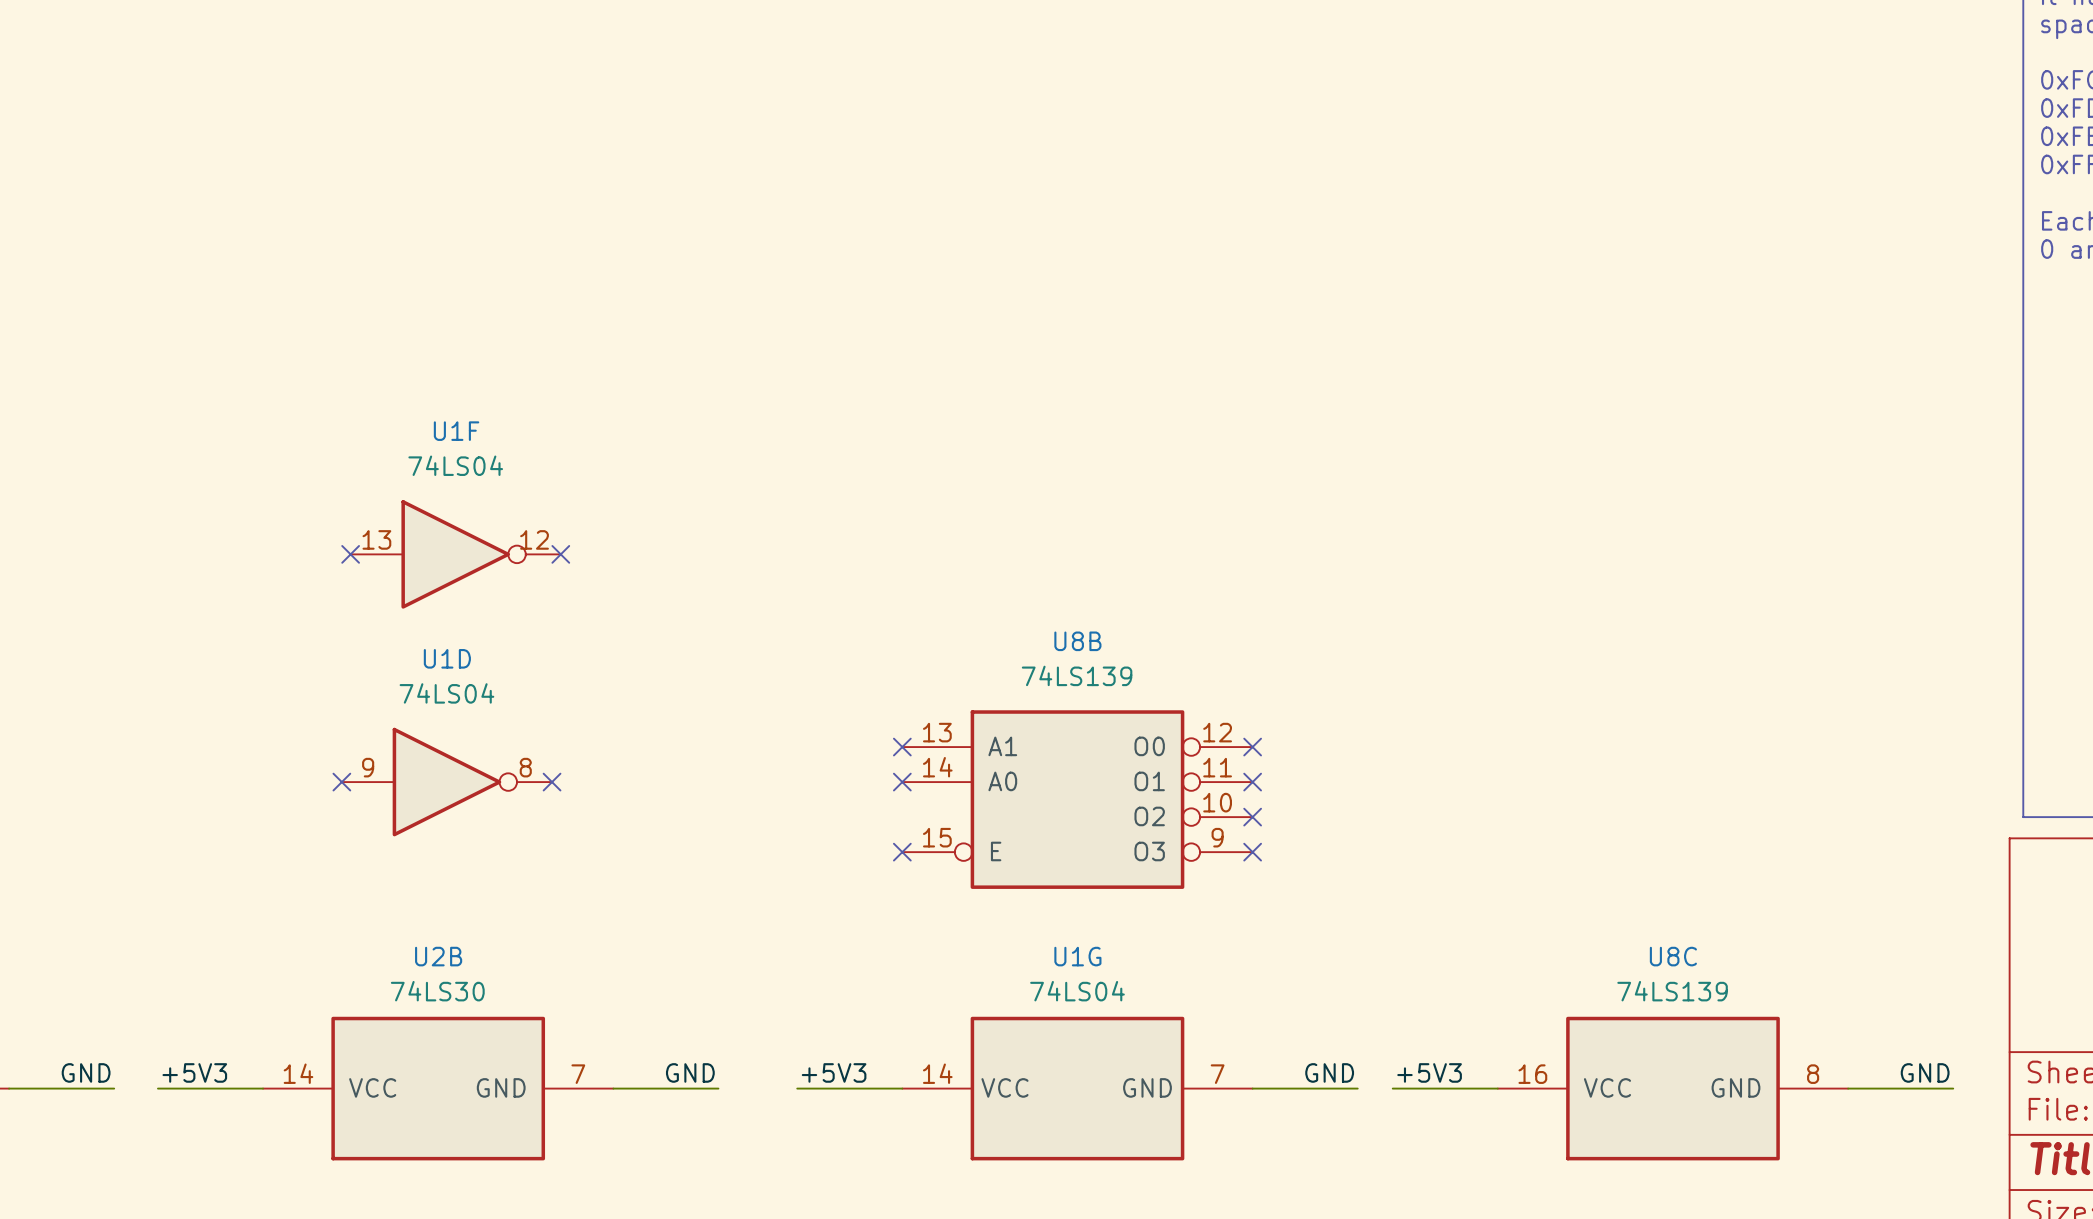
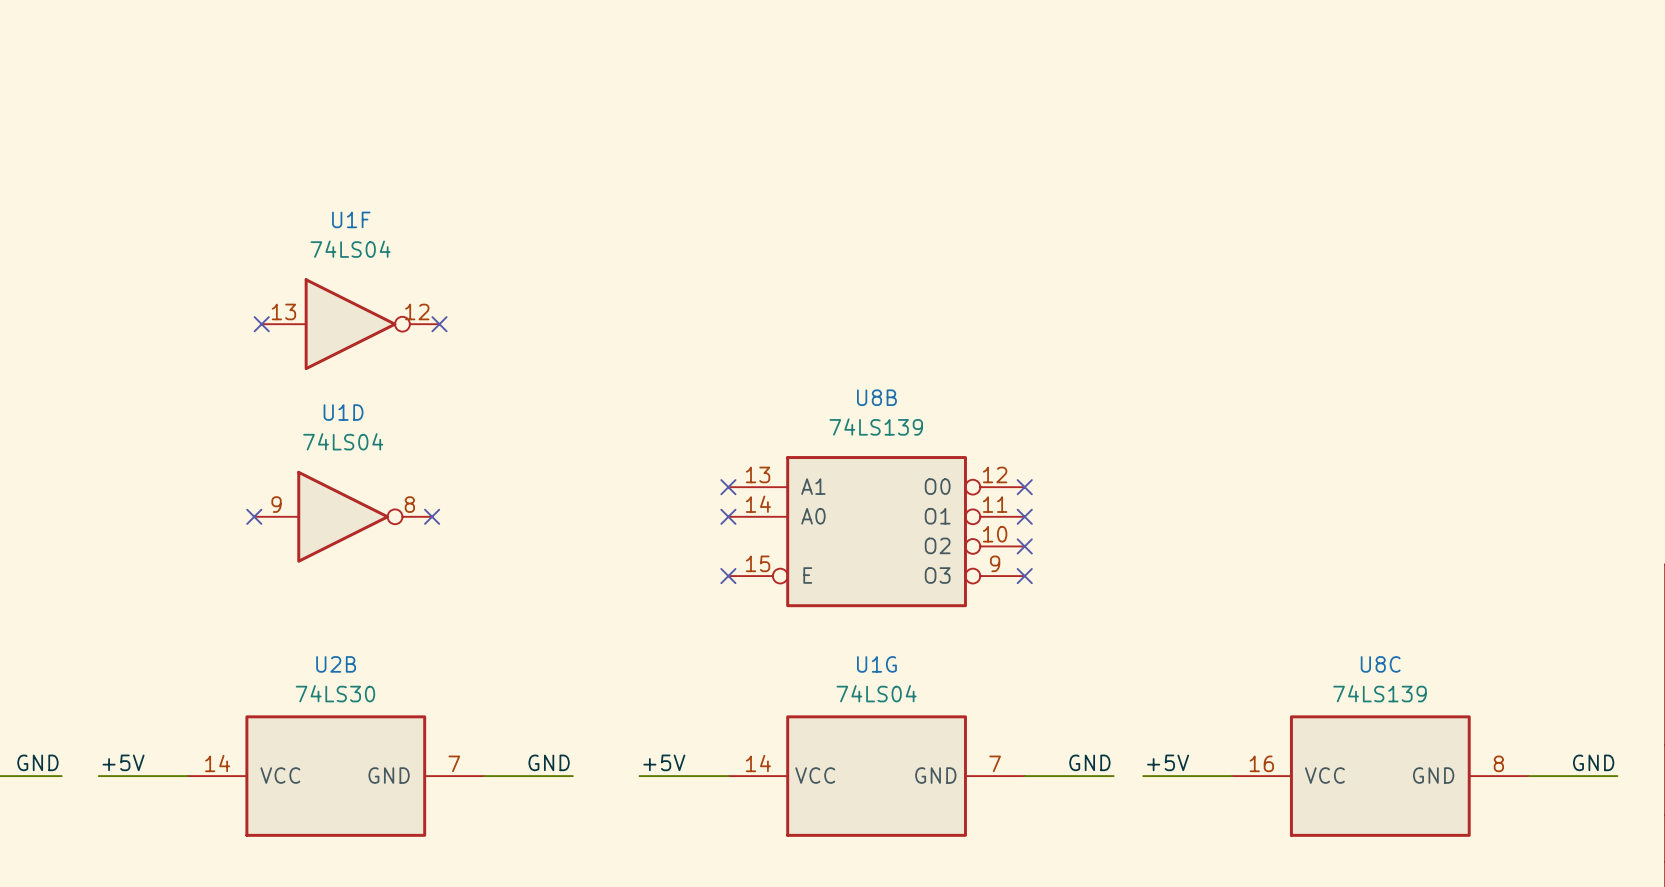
label: +5V3 (194, 1072) -> +5V (123, 762)
label: +5V3 (834, 1072) -> +5V (664, 762)
label: +5V3 (1429, 1072) -> +5V (1168, 762)

